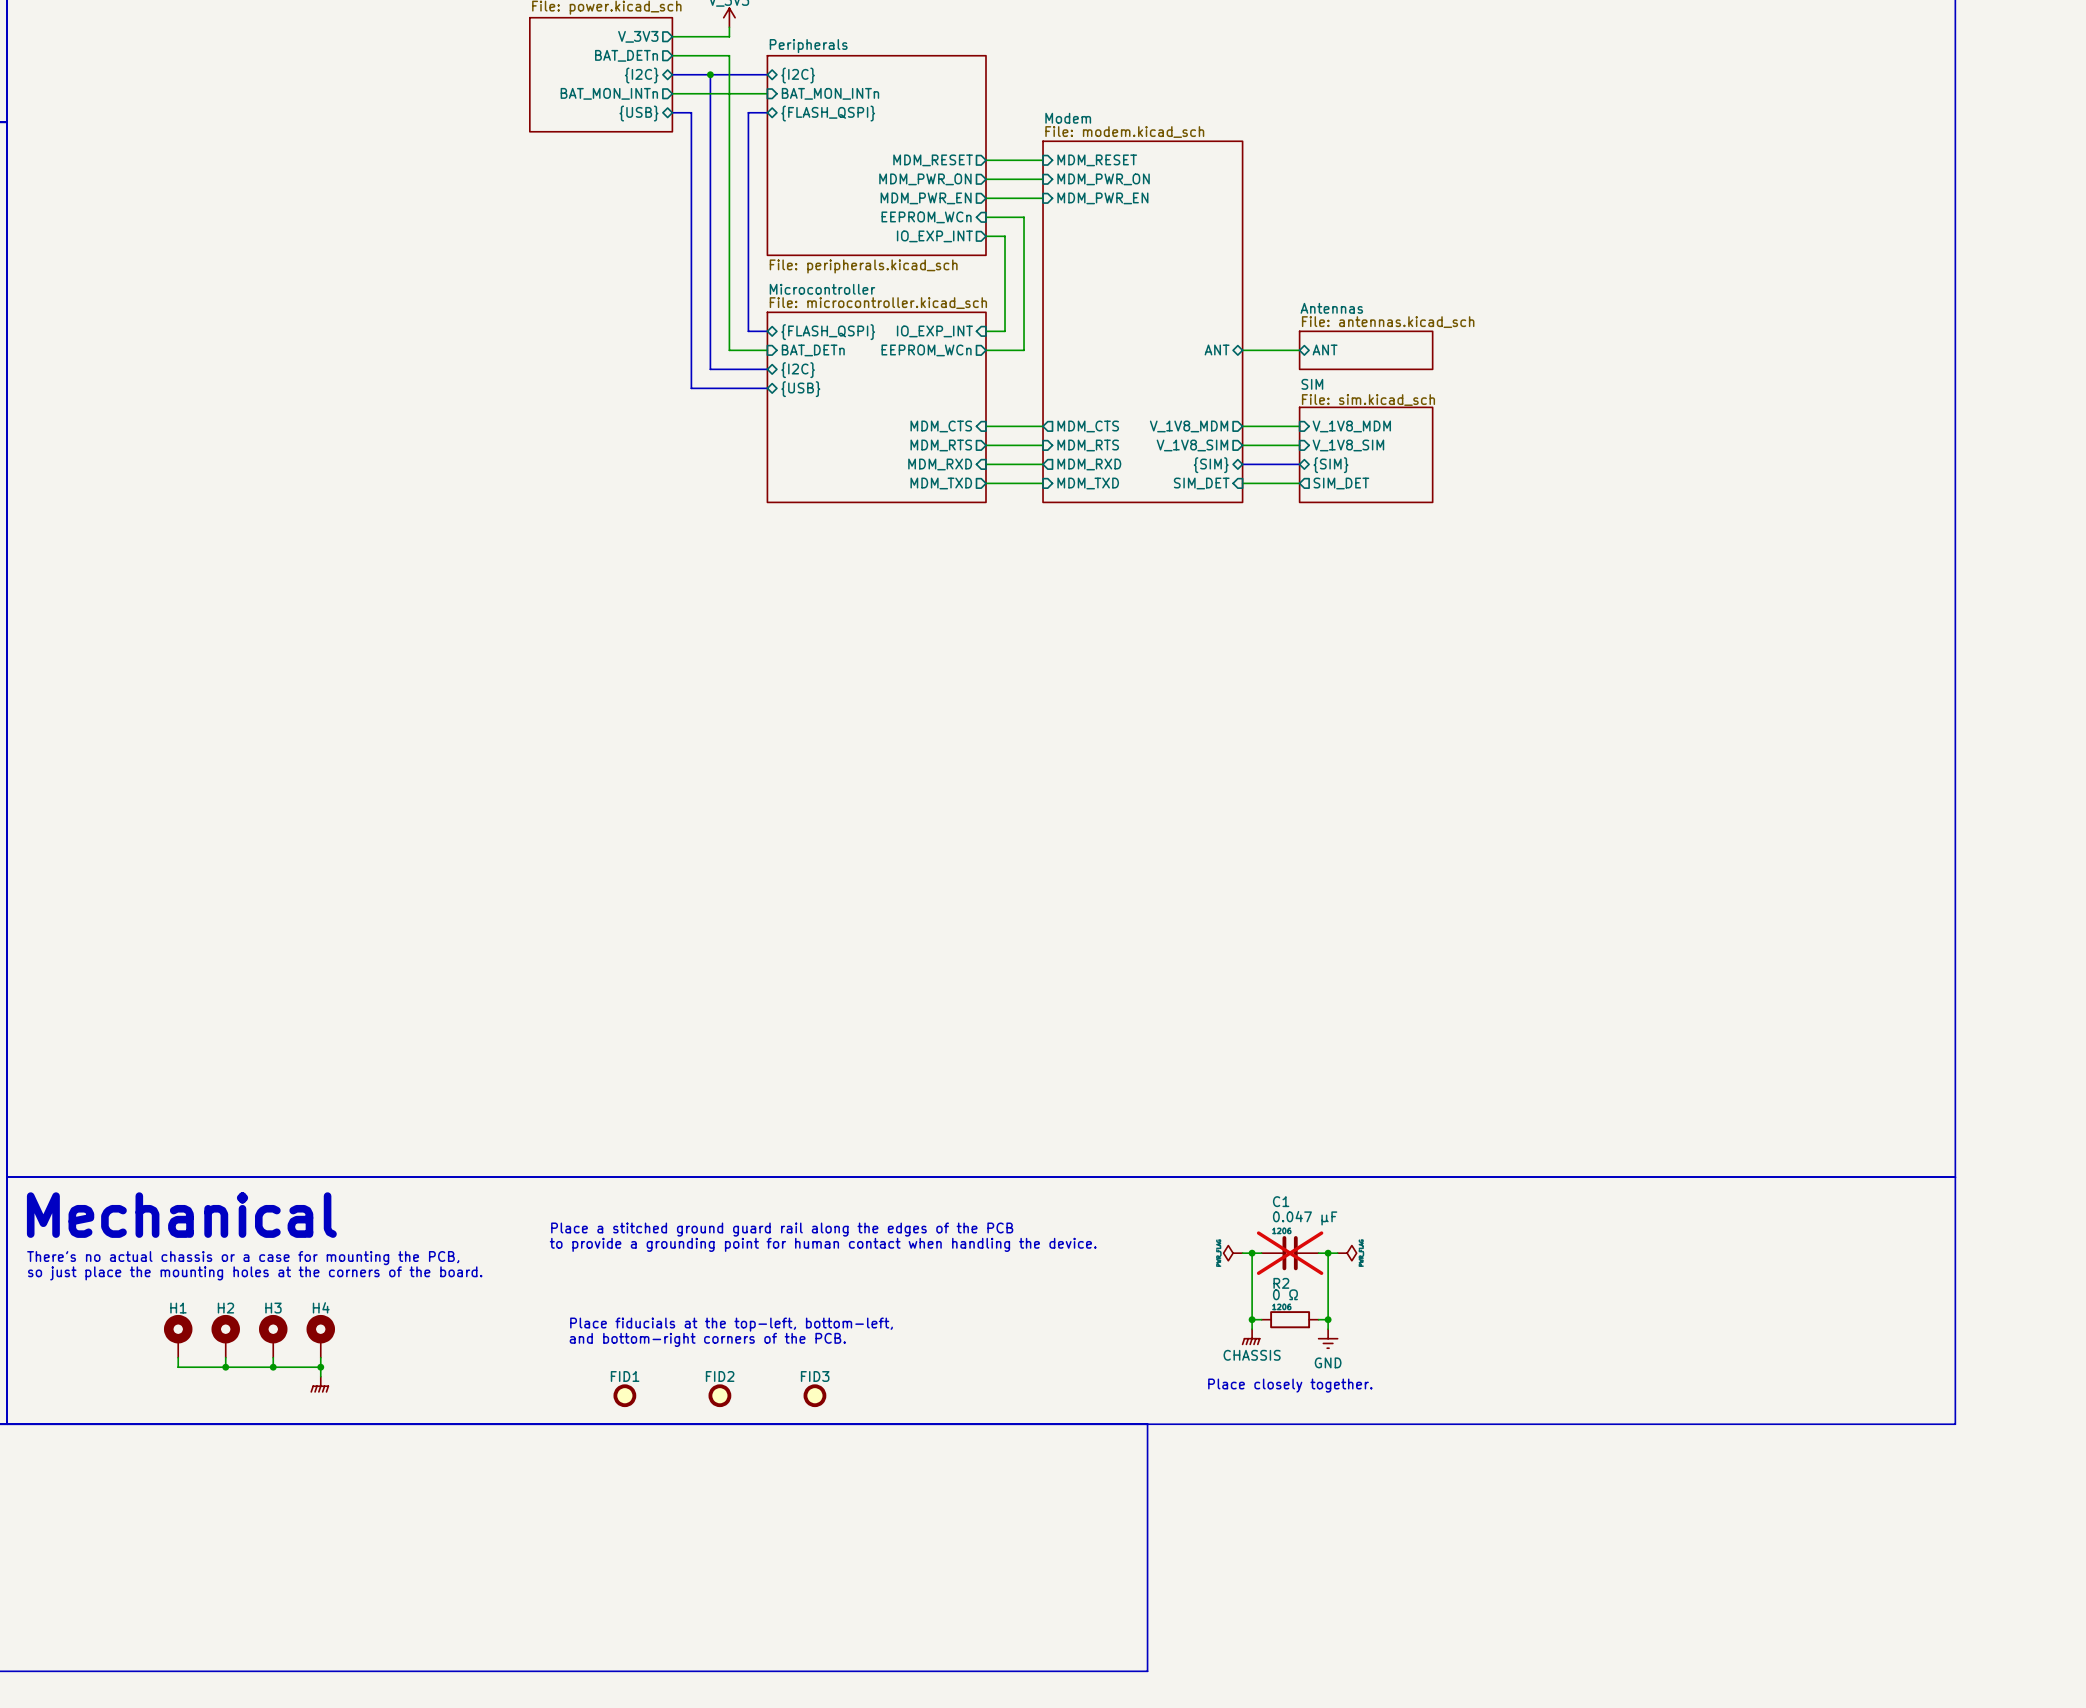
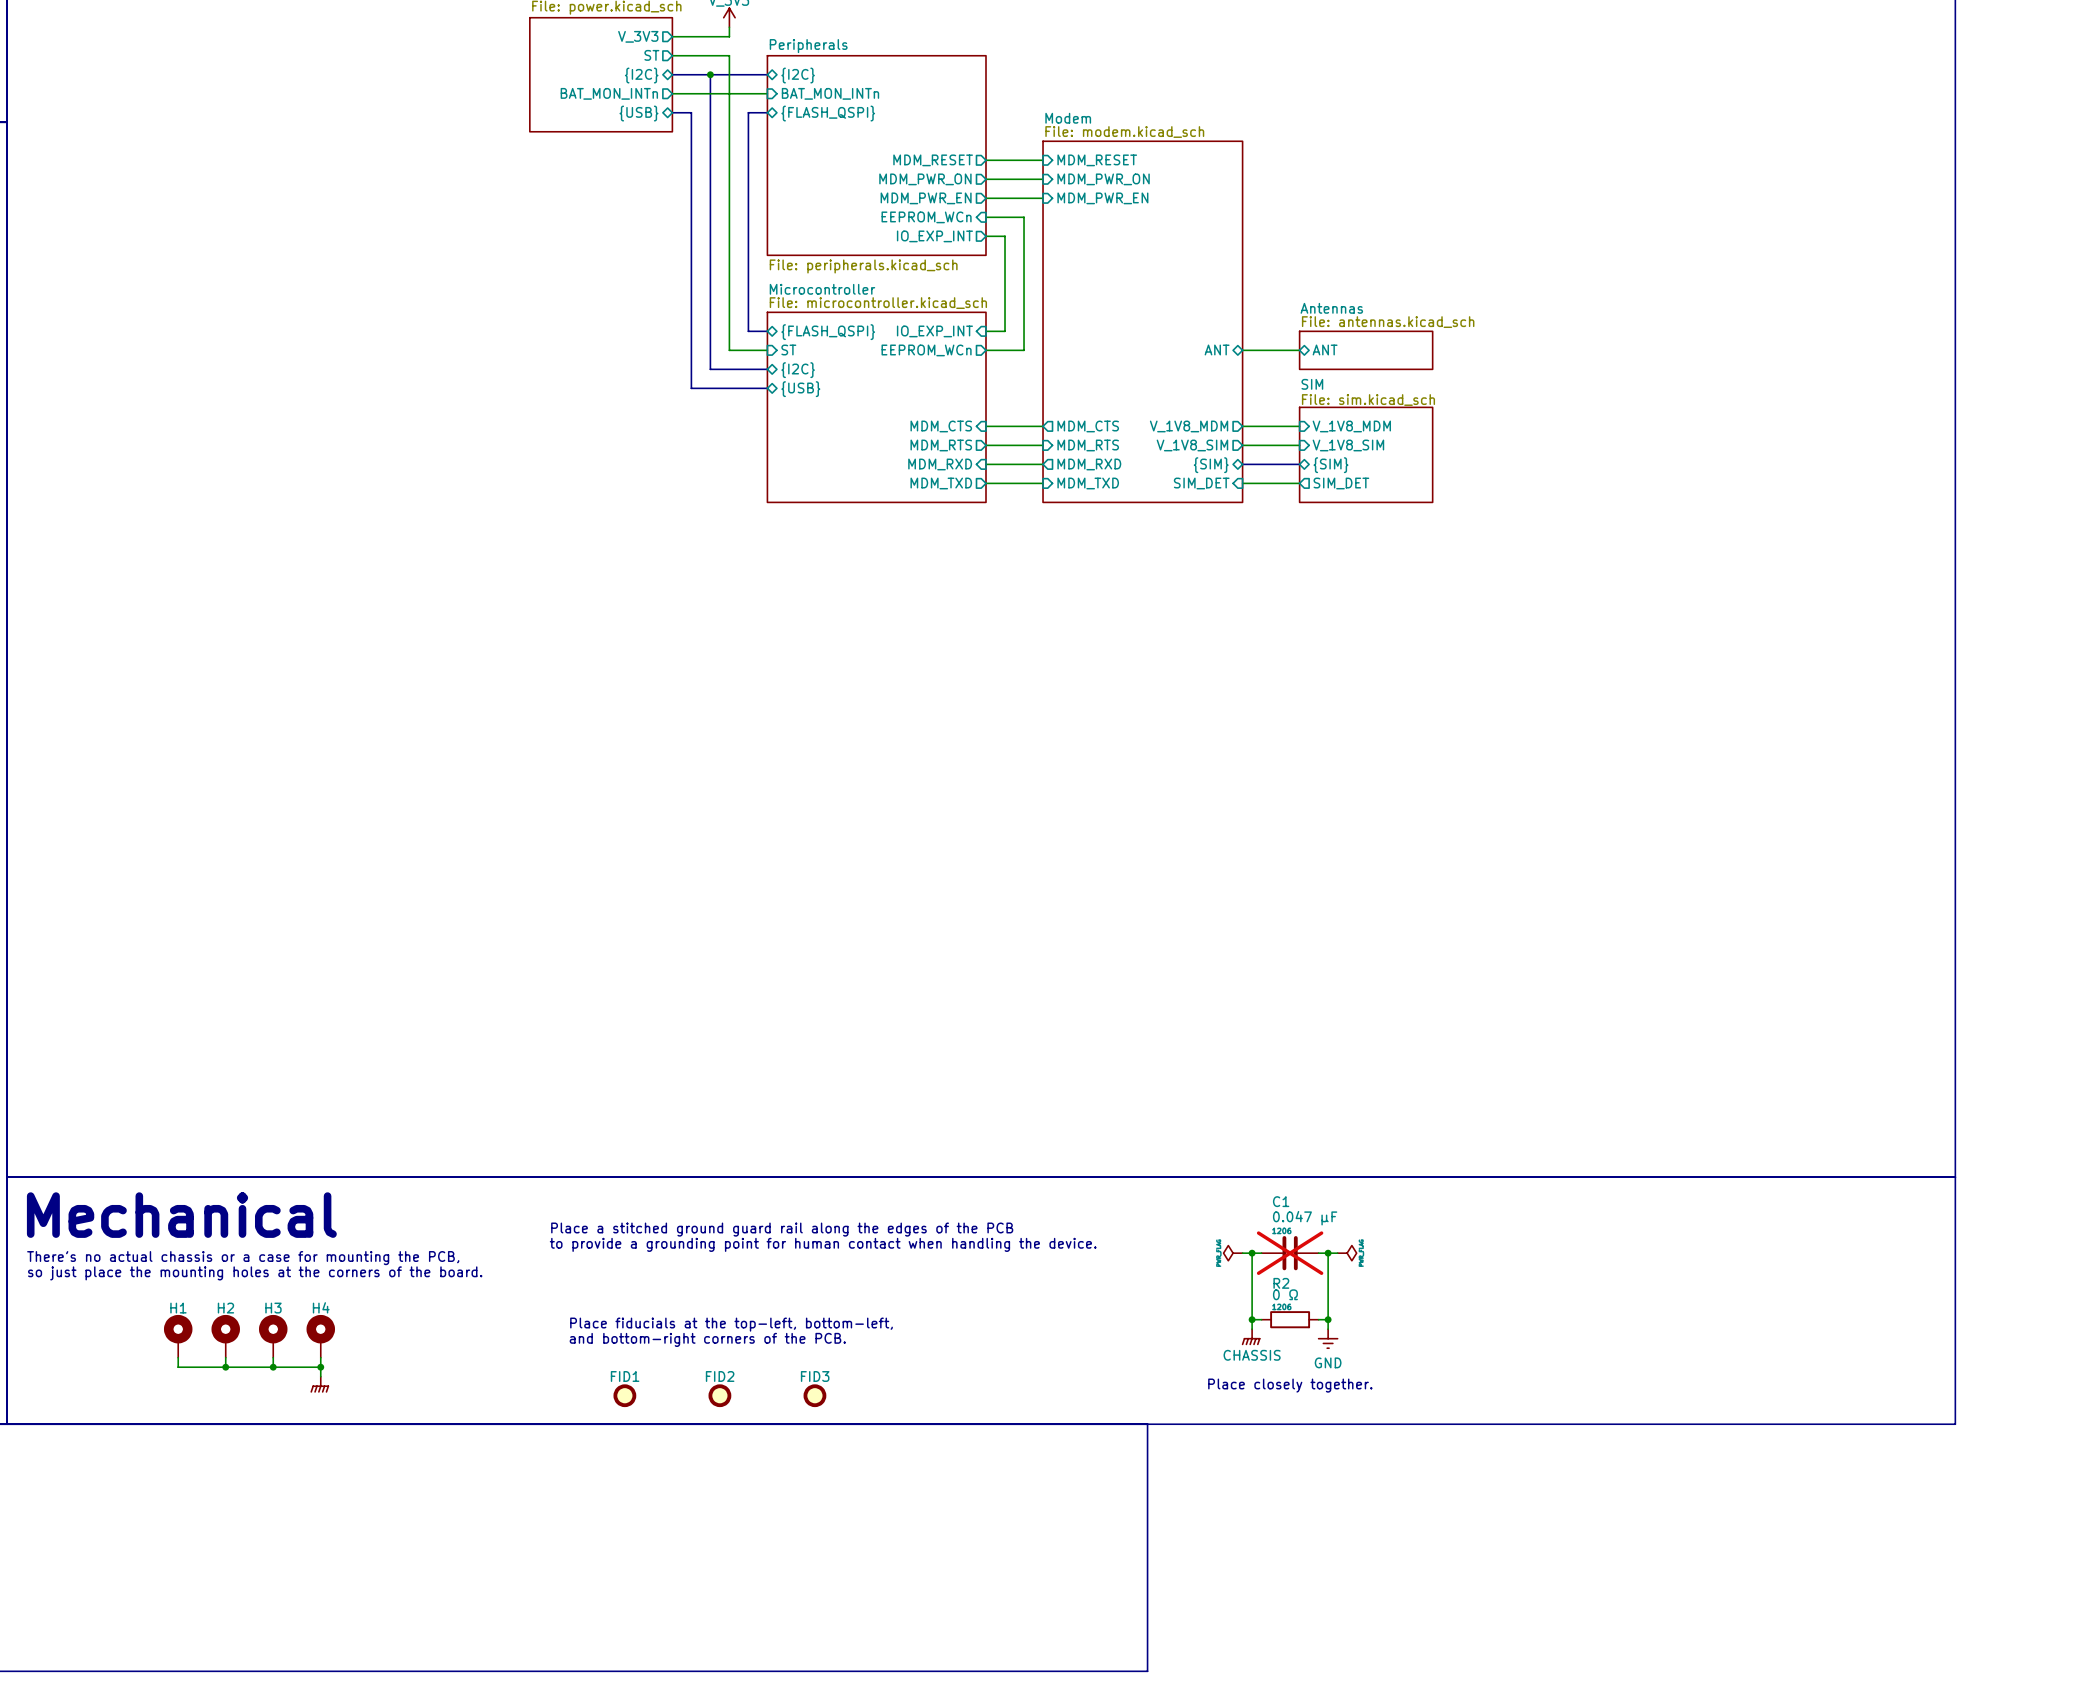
sheet pin: BAT_DETn (626, 55) -> ST (651, 55)
sheet pin: BAT_DETn (813, 350) -> ST (788, 349)

